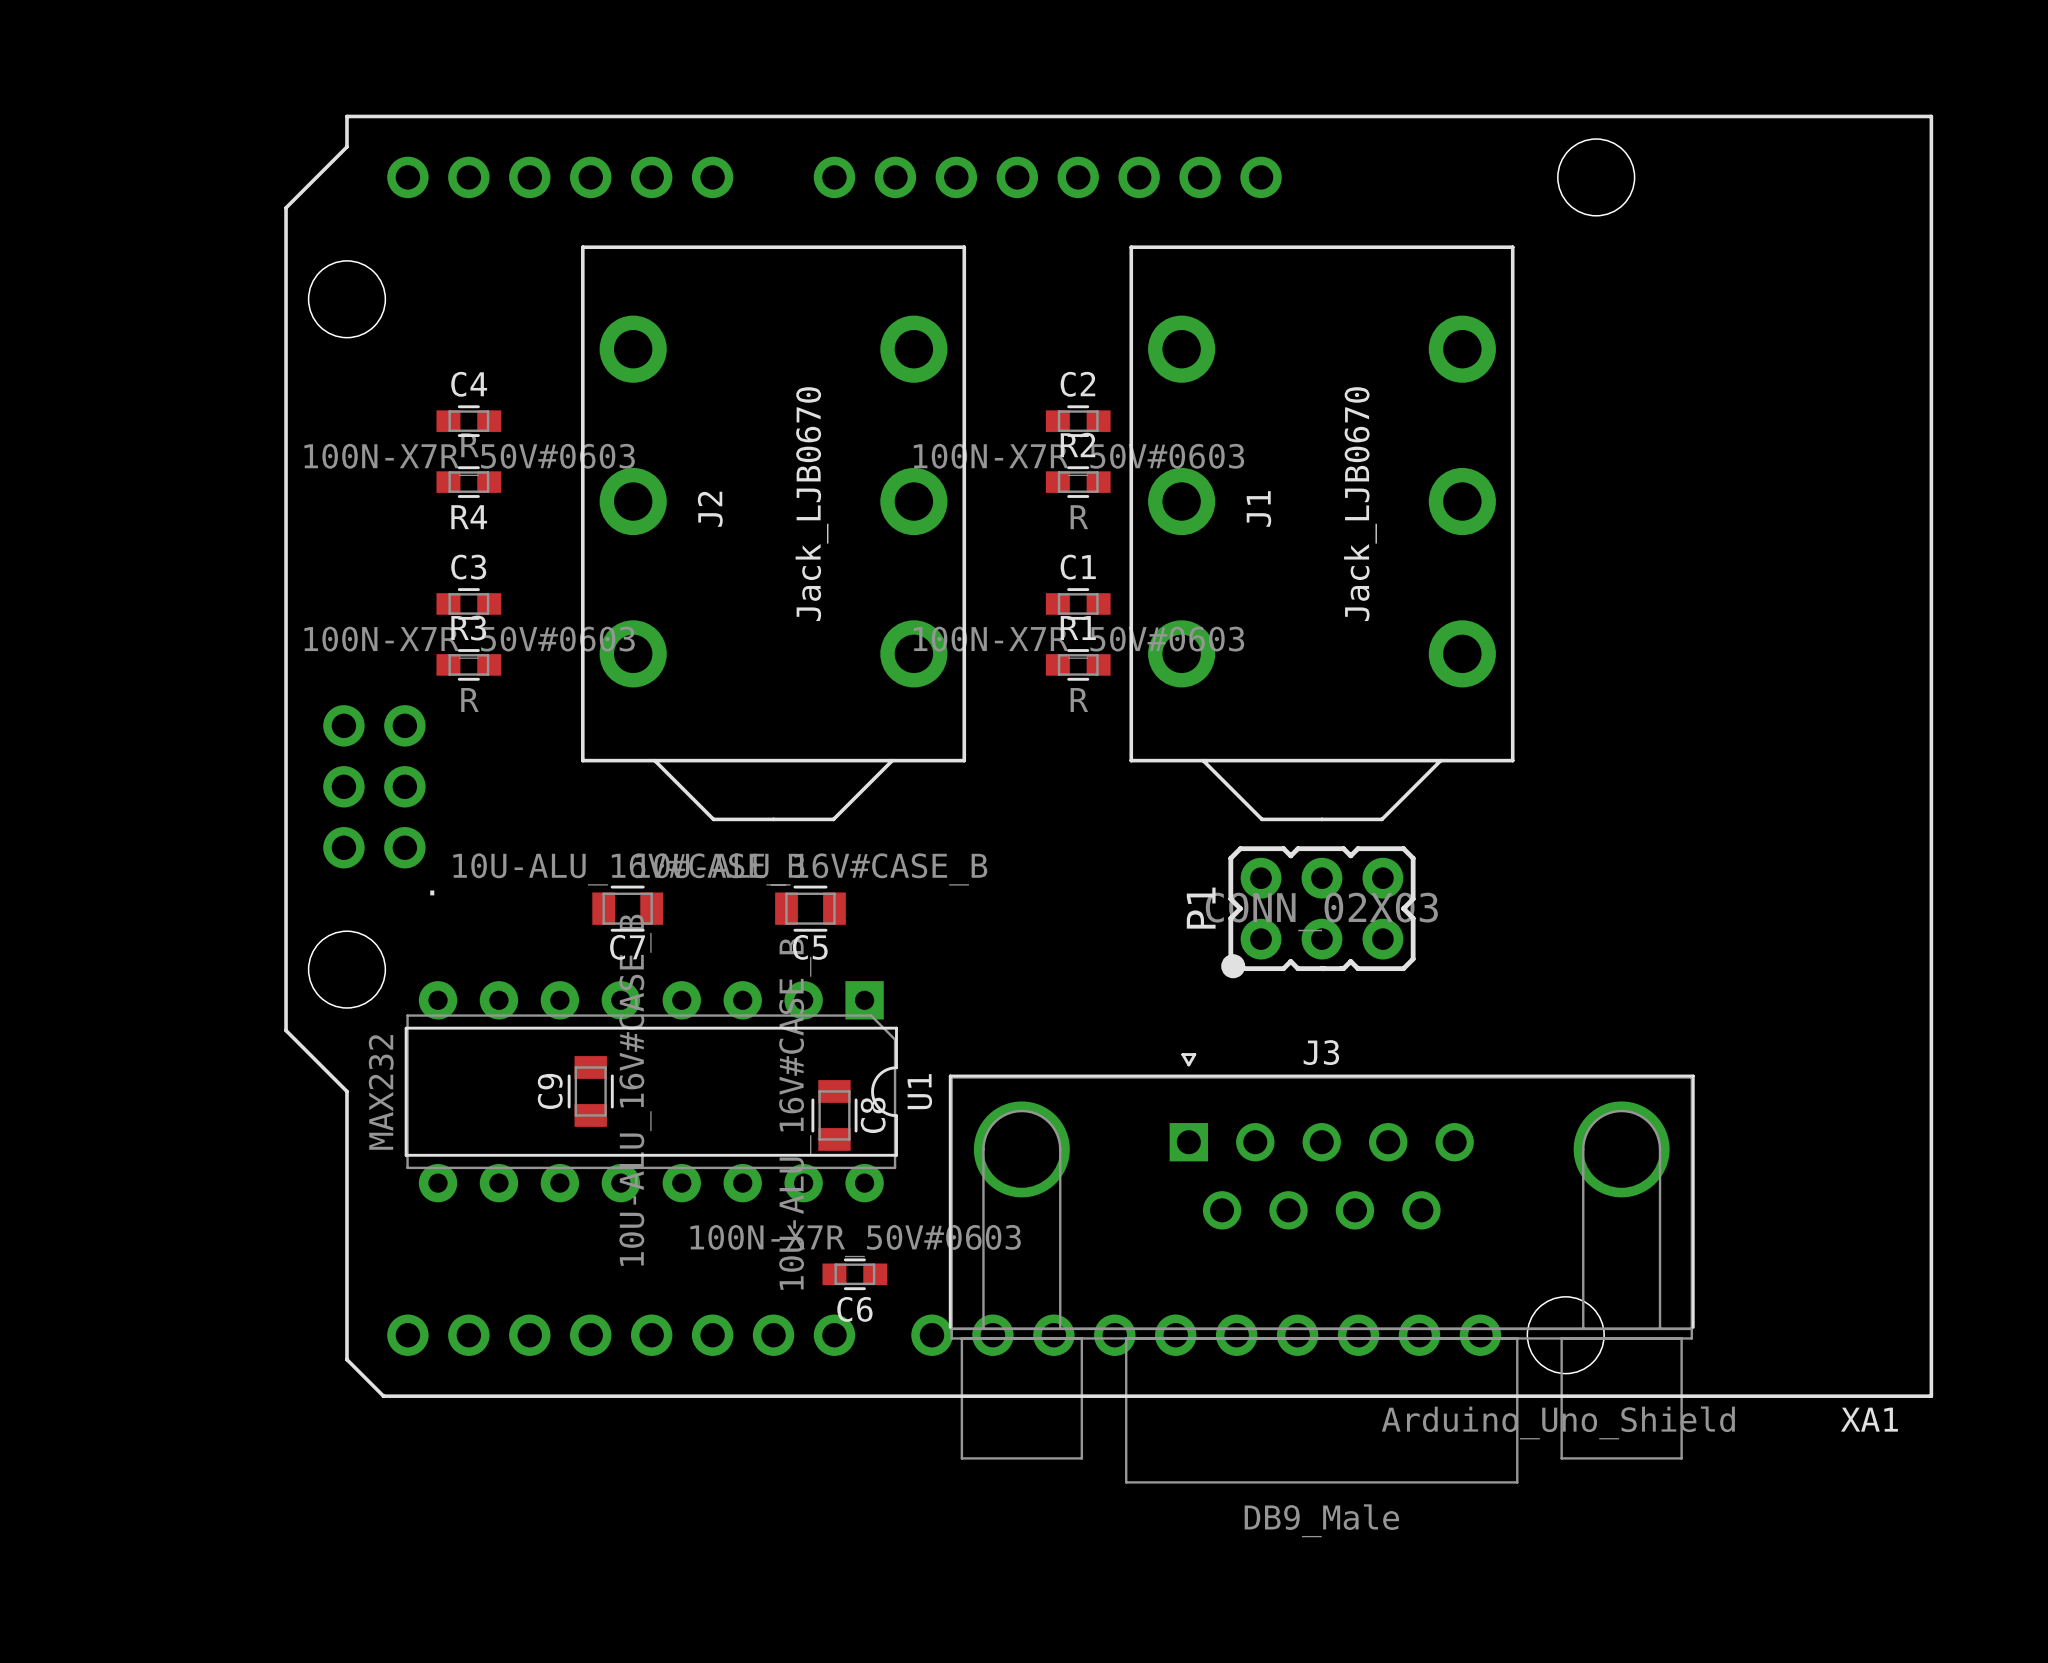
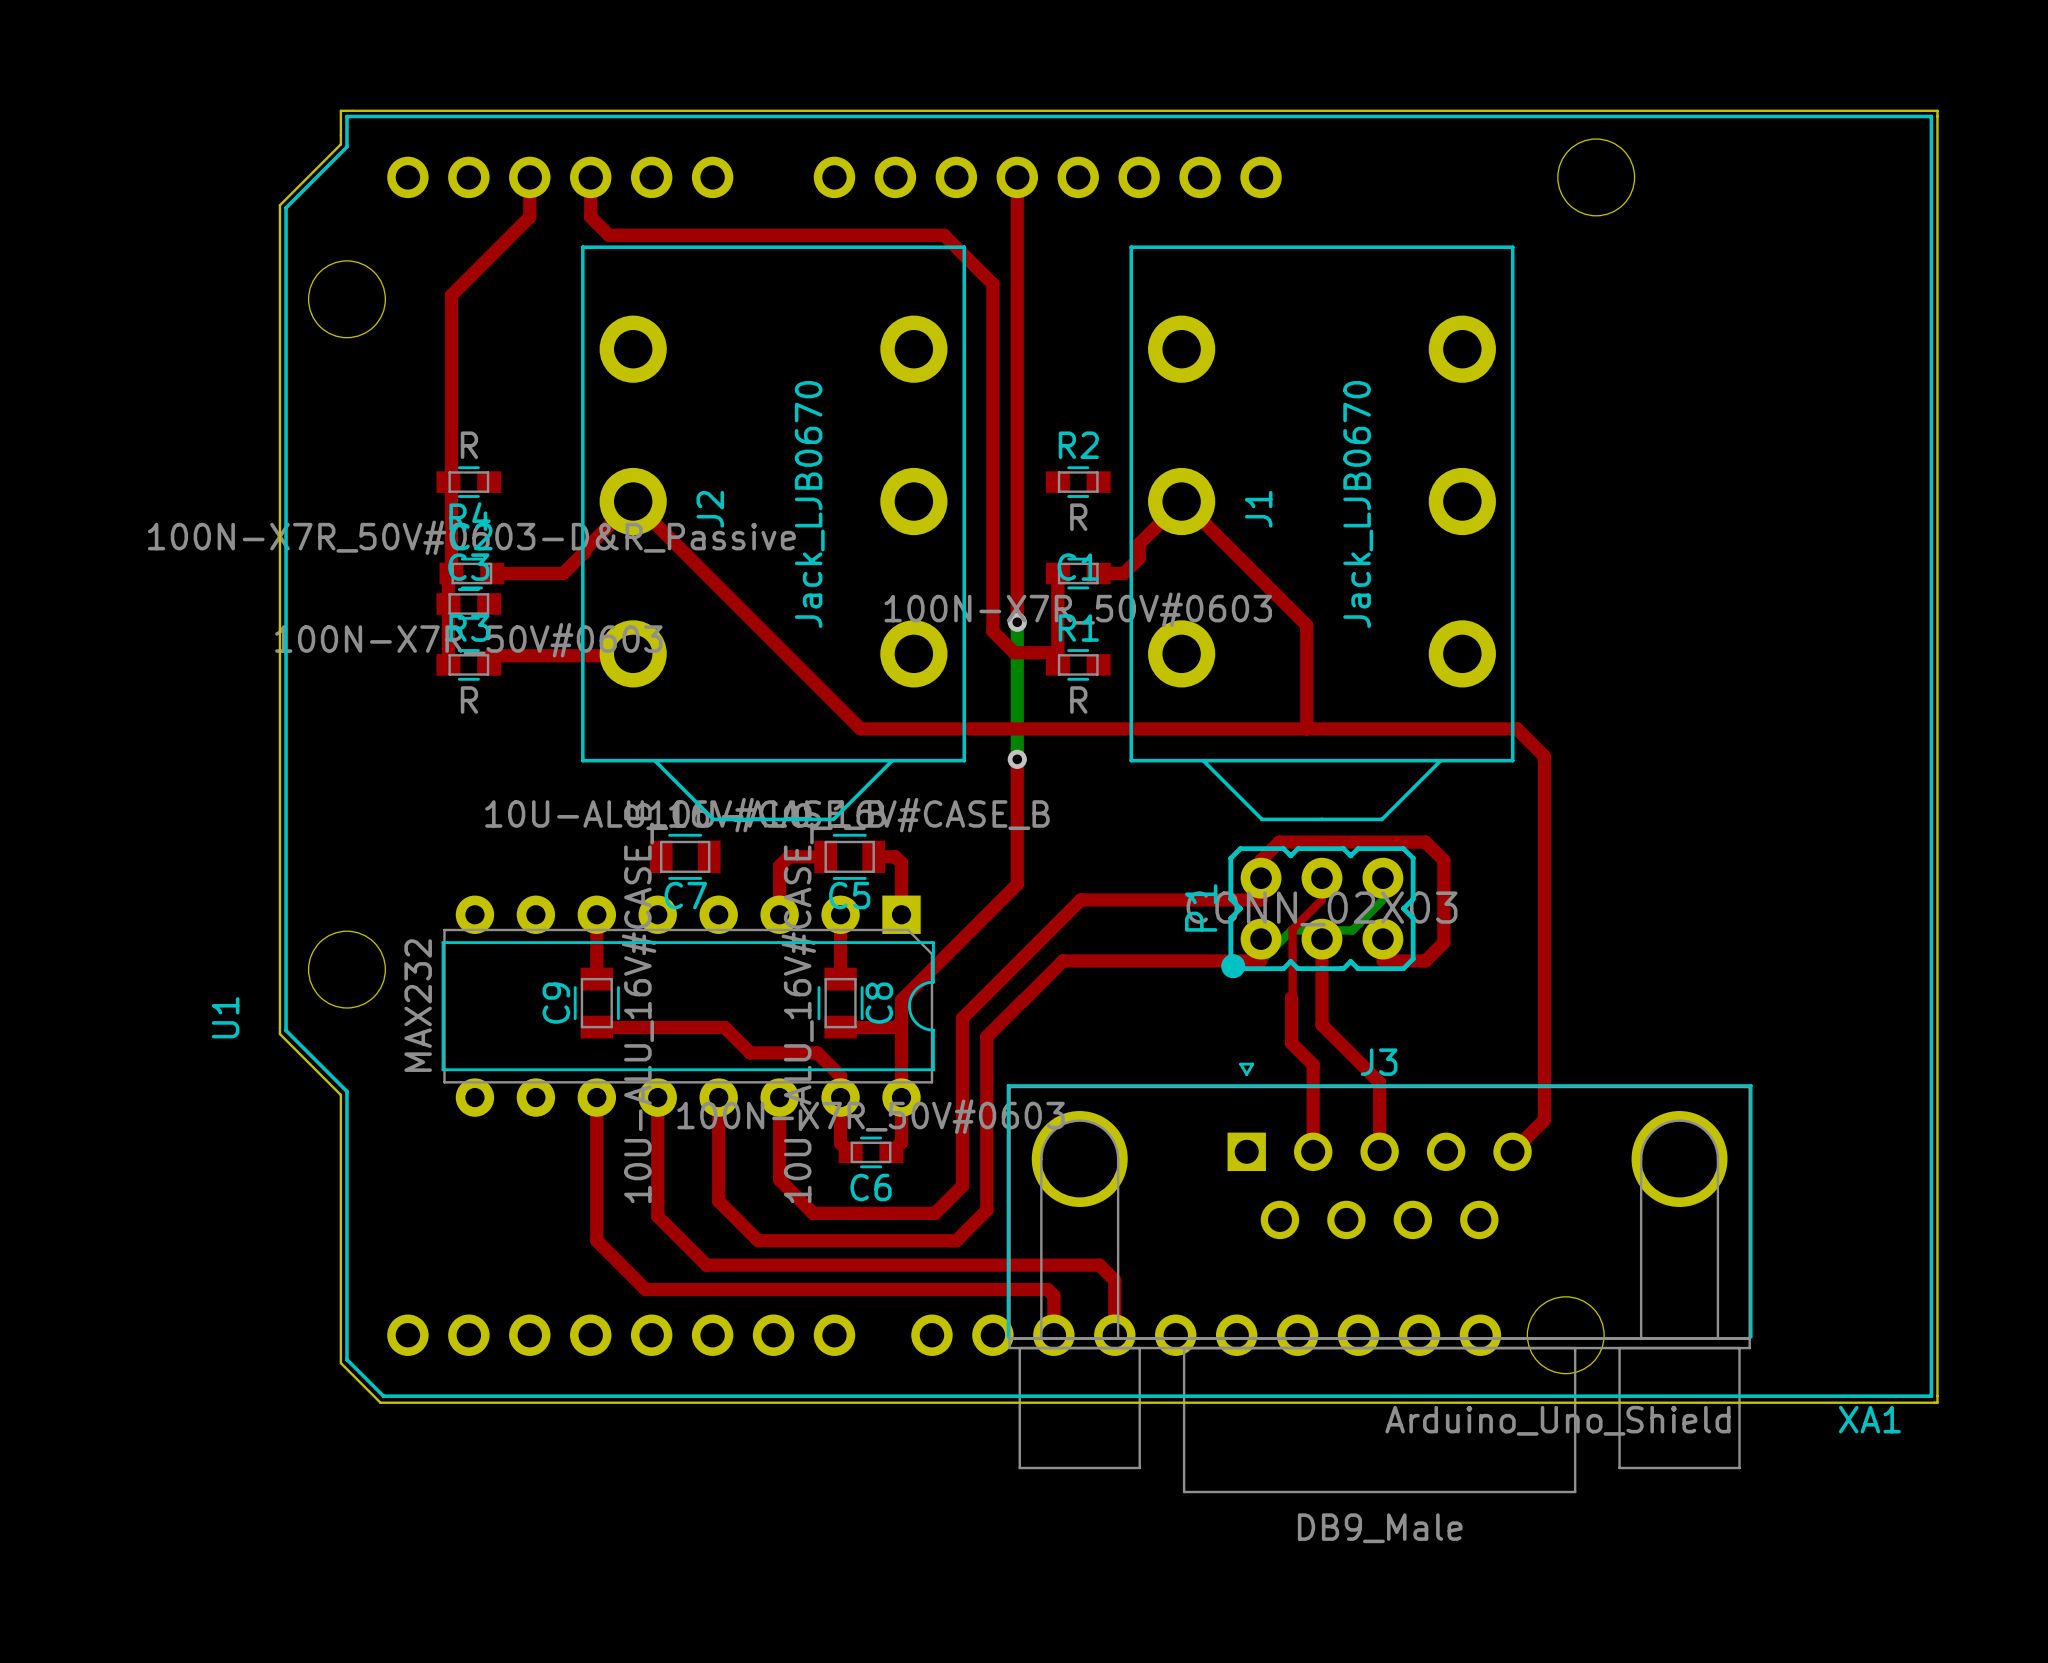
board edge: none -> (340, 110) (340, 144) (279, 205) (279, 1034) (340, 1094) (340, 1363) (380, 1402) (1937, 1402) (1937, 110) (340, 110)
XA1 footprint: [284, 114, 1934, 1398] -> [284, 114, 1934, 1398]
top track: none -> (529, 177) (529, 217) (451, 295) (451, 573) (448, 576) (448, 655) (451, 652)
top track: none -> (590, 177) (590, 217) (609, 235) (944, 235) (992, 284) (992, 631) (1014, 652) (1057, 652) (1057, 573)
top track: none -> (1017, 177) (1017, 622)
C4: 100N-X7R_50V#0603 (468, 421) -> none
C2 position: (1078, 421) -> (471, 573)
C2 value: 100N-X7R_50V#0603 (1078, 459) -> 100N-X7R_50V#0603-D&R_Passive (471, 537)
top track: none -> (492, 573) (563, 573) (633, 501) (860, 728) (1516, 728) (1544, 756) (1544, 1119) (1512, 1151)
top track: none -> (1098, 573) (1123, 573) (1139, 558) (1139, 543) (1182, 501) (1306, 625) (1306, 728)
C1 position: (1078, 603) -> (1078, 573)
bottom track: none -> (1017, 622) (1017, 759)
via: none -> (1017, 622)
top track: none -> (633, 653) (631, 655) (489, 655)
top track: none -> (1017, 759) (1017, 884) (901, 1000) (901, 1142) (891, 1152)
via: none -> (1017, 759)
top track: none -> (825, 856) (788, 856) (779, 866) (779, 914)
top track: none -> (873, 856) (895, 856) (901, 862) (901, 914)
top track: none -> (1321, 899) (1292, 929) (1291, 1043) (1313, 1064) (1313, 1151)
bottom track: none -> (1382, 899) (1352, 930) (1291, 930) (1261, 960)
C7 position: (627, 908) -> (685, 856)
C5 position: (810, 908) -> (849, 856)
top track: none -> (596, 914) (596, 979)
top track: none -> (840, 914) (840, 979)
top track: none -> (1261, 960) (1063, 960) (1023, 1000)
top track: none -> (1321, 960) (1321, 1024) (1379, 1082) (1379, 1151)
top track: none -> (1382, 960) (1425, 960) (1443, 942) (1443, 860) (1425, 842) (1279, 842) (1261, 860) (1261, 899) (1080, 899) (962, 1018) (962, 1185) (935, 1213) (813, 1213) (779, 1179) (779, 1097)
top track: none -> (1022, 1000) (986, 1036) (986, 1210) (956, 1240) (758, 1240) (718, 1201) (718, 1097)
top track: none -> (901, 1021) (895, 1027) (840, 1027)
top track: none -> (596, 1027) (724, 1027) (750, 1052) (817, 1052) (840, 1076) (840, 1143) (850, 1152)
C9 position: (590, 1091) -> (596, 1003)
U1 position: (651, 1091) -> (688, 1006)
U1 name position: U1 (919, 1091) -> U1 (225, 1017)
top track: none -> (596, 1097) (596, 1240) (645, 1289) (1047, 1289) (1053, 1295) (1053, 1335)
top track: none -> (657, 1097) (657, 1216) (706, 1265) (1099, 1265) (1114, 1280) (1114, 1335)
C8 position: (834, 1115) -> (840, 1003)
J3 position: (1321, 1268) -> (1379, 1277)
C6 position: (854, 1274) -> (871, 1152)

